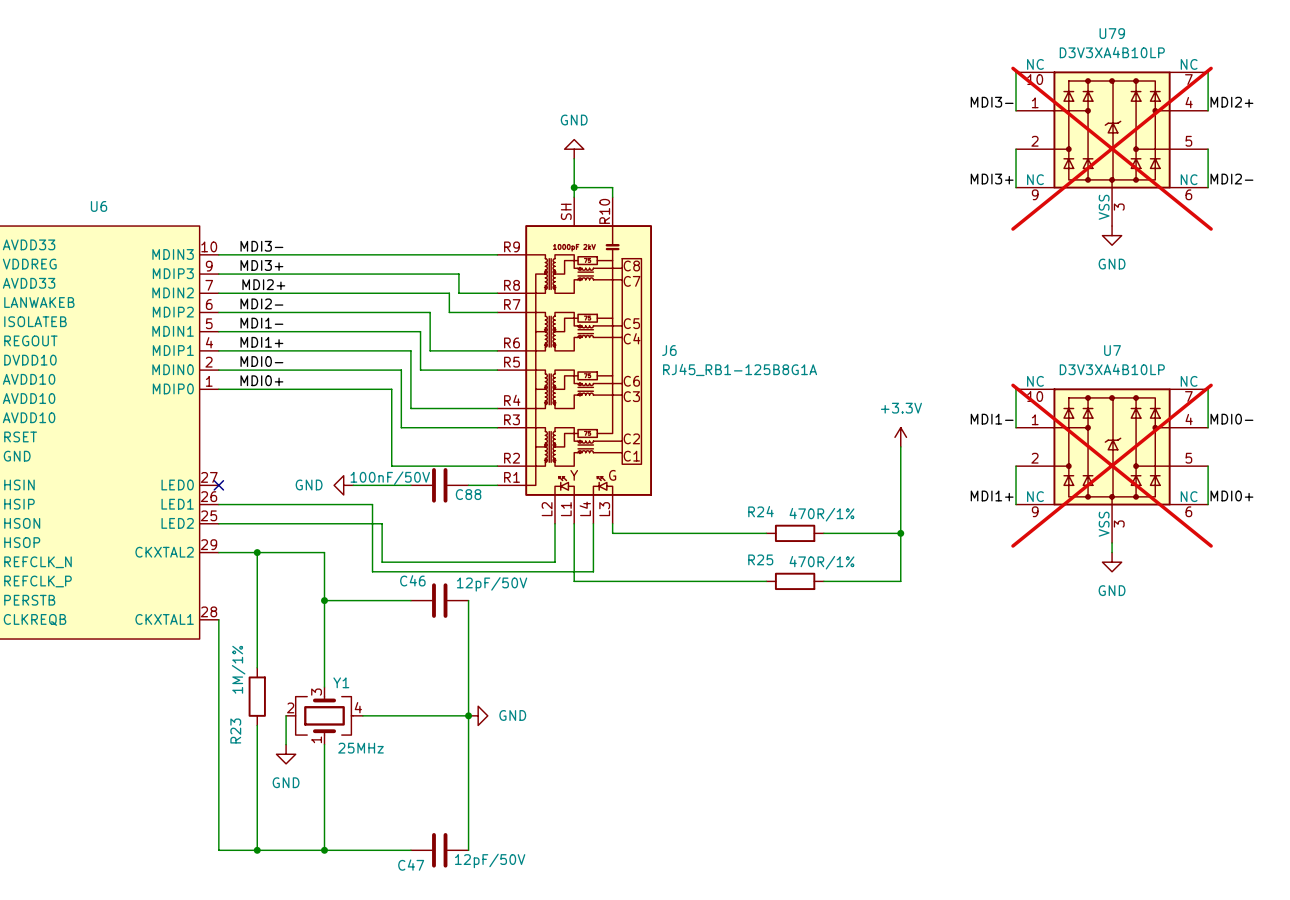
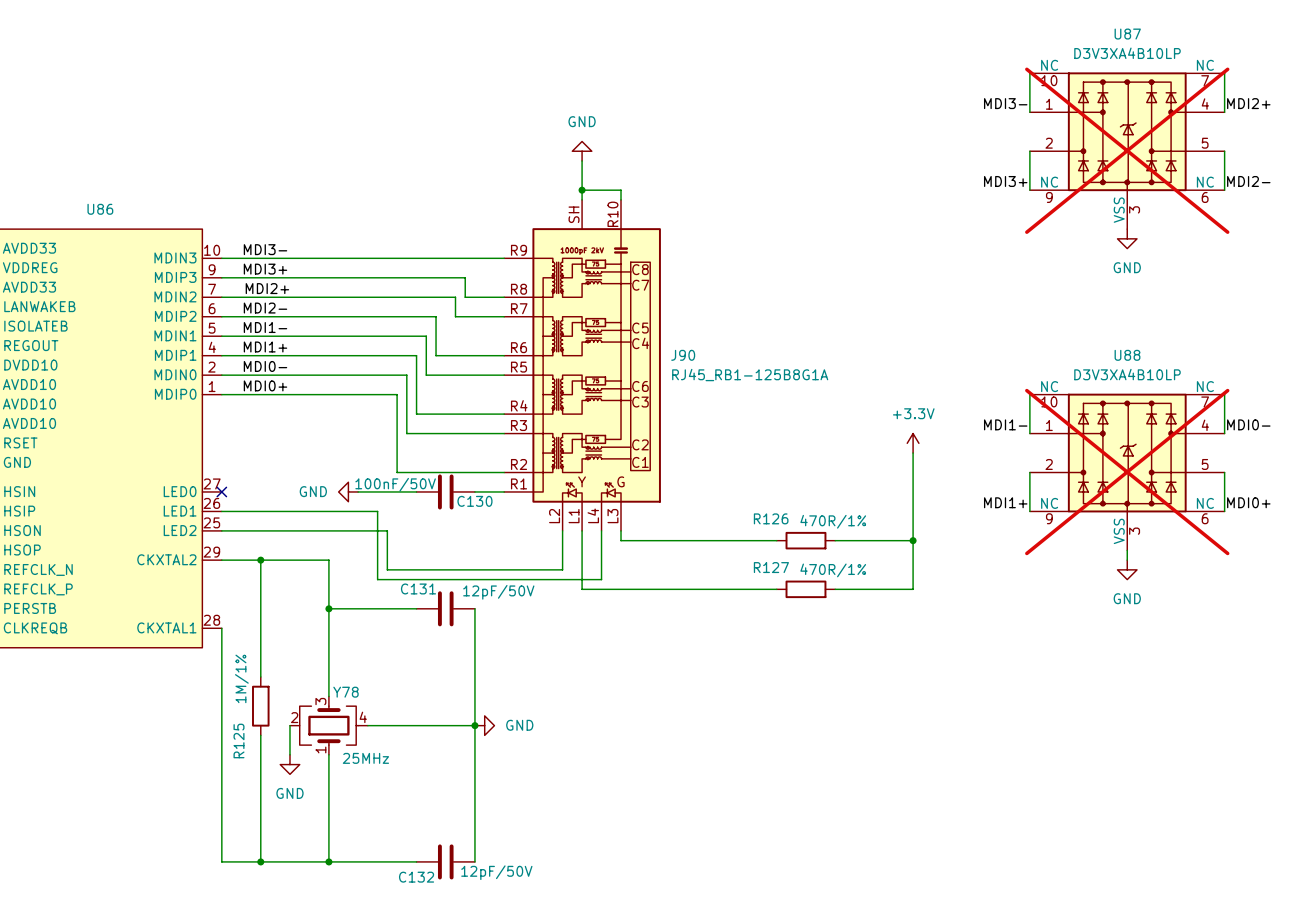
U79 name: U79 (1112, 33) -> U87 (1127, 34)
U6 name: U6 (99, 206) -> U86 (100, 209)
J6 name: J6 (669, 350) -> J90 (683, 355)
U7 name: U7 (1112, 350) -> U88 (1127, 355)
C88 name: C88 (468, 494) -> C130 (474, 501)
R24 name: R24 (760, 511) -> R126 (771, 518)
R25 name: R25 (760, 559) -> R127 (771, 567)
C46 name: C46 (412, 580) -> C131 (418, 588)
Y1 name: Y1 (341, 682) -> Y78 (345, 692)
R23 name: R23 (235, 730) -> R125 (239, 740)
C47 name: C47 (411, 865) -> C132 (416, 877)

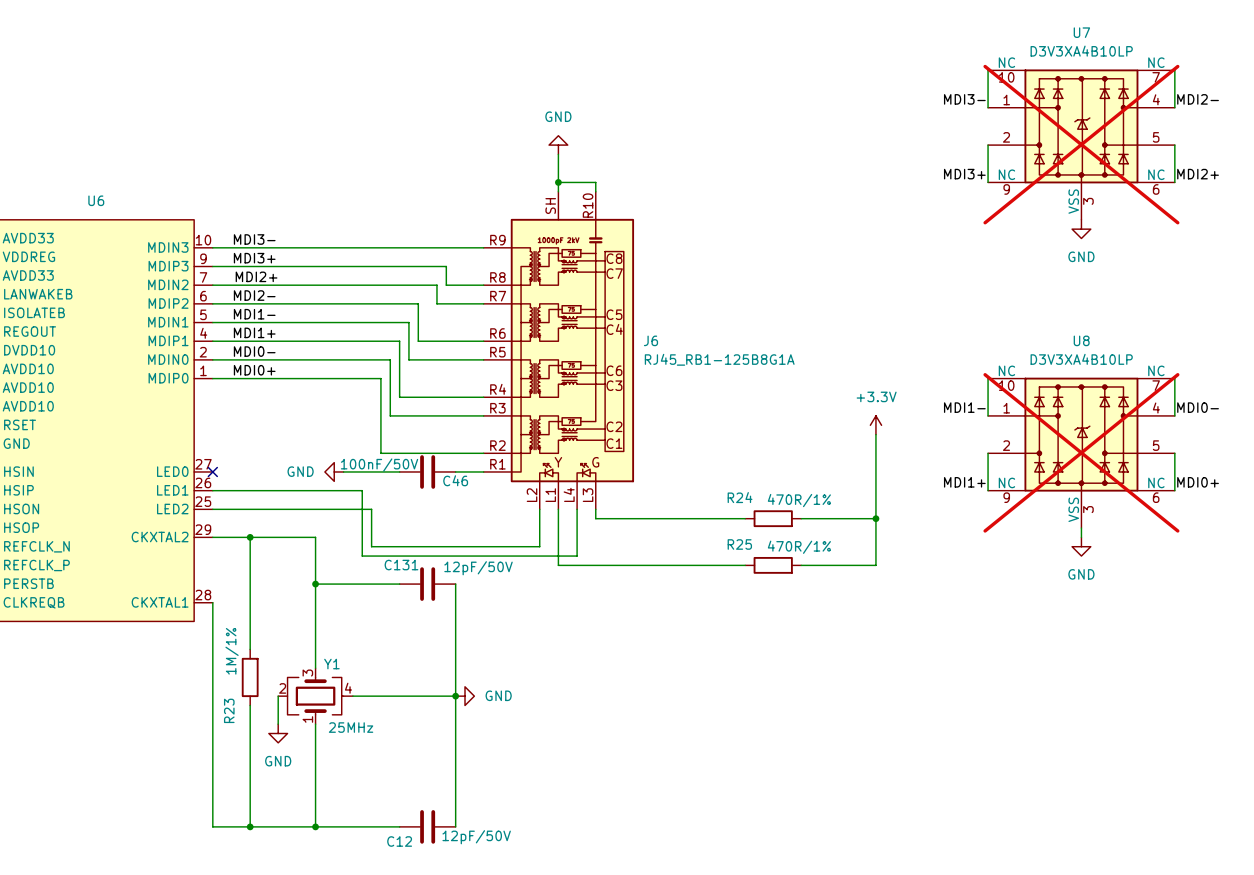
U87 name: U87 (1127, 34) -> U7 (1081, 32)
label: MDI2+ (1248, 103) -> MDI2- (1198, 99)
label: MDI2- (1248, 181) -> MDI2+ (1198, 174)
U86 name: U86 (100, 209) -> U6 (96, 200)
J90 name: J90 (683, 355) -> J6 (650, 340)
U88 name: U88 (1127, 355) -> U8 (1081, 340)
C130 name: C130 (474, 501) -> C46 (455, 480)
R126 name: R126 (771, 518) -> R24 (740, 497)
R127 name: R127 (771, 567) -> R25 (739, 544)
Y78 name: Y78 (345, 692) -> Y1 (331, 664)
R125 name: R125 (239, 740) -> R23 (229, 710)
C132 name: C132 (416, 877) -> C12 (399, 841)

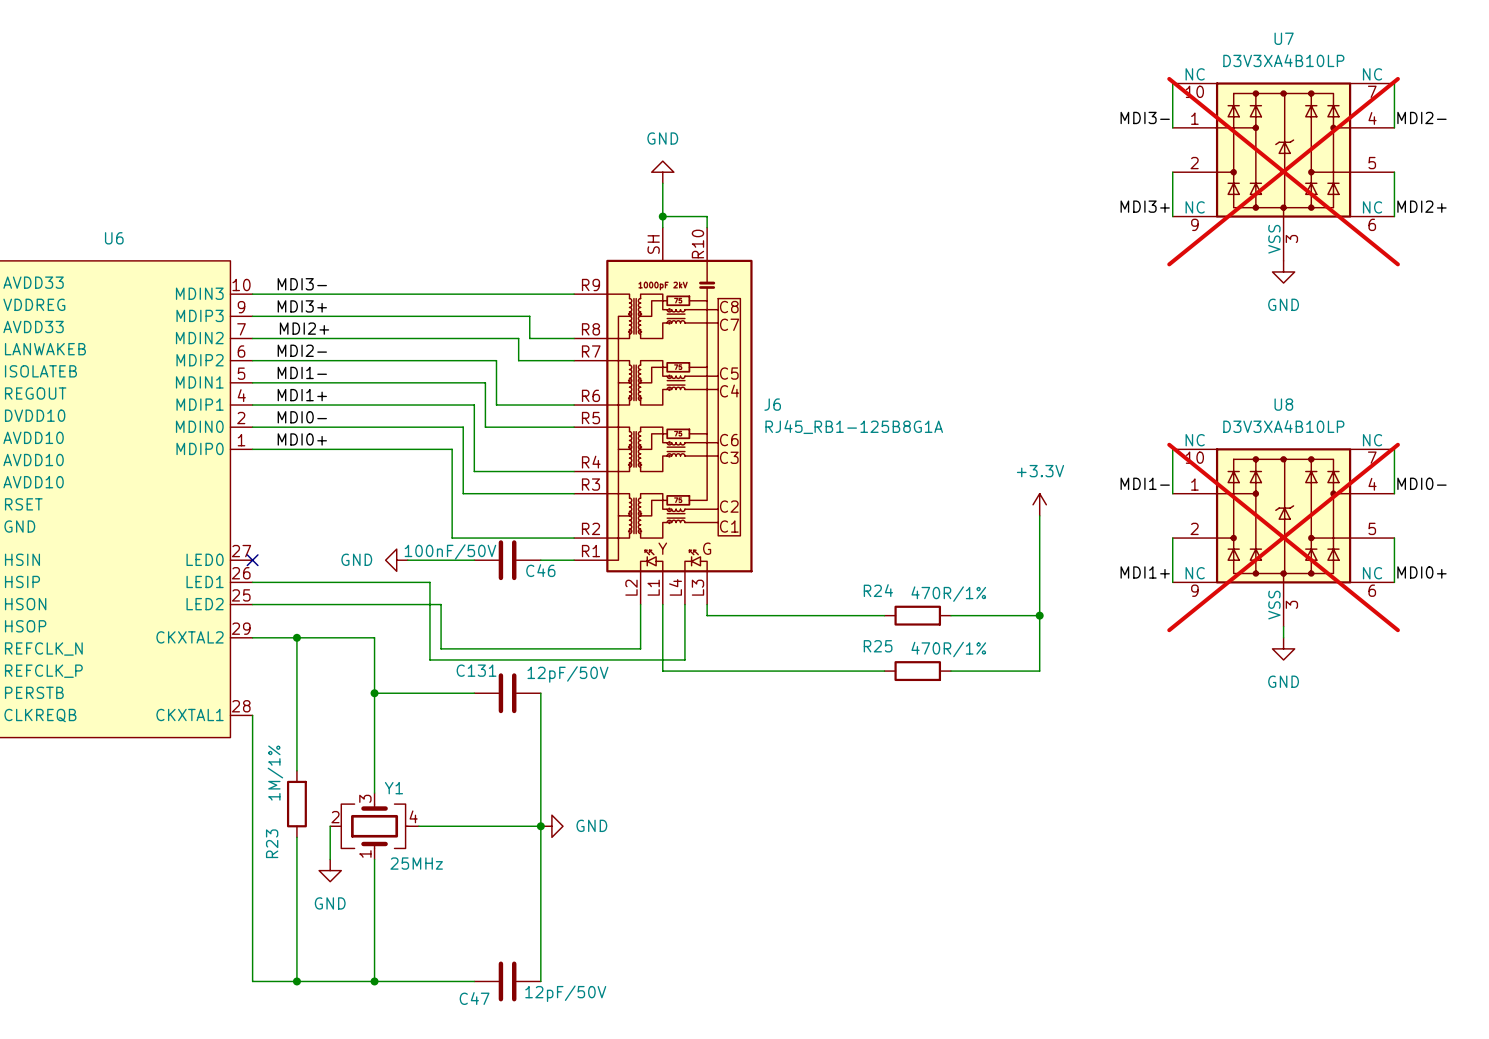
C12 name: C12 (399, 841) -> C47 (474, 998)

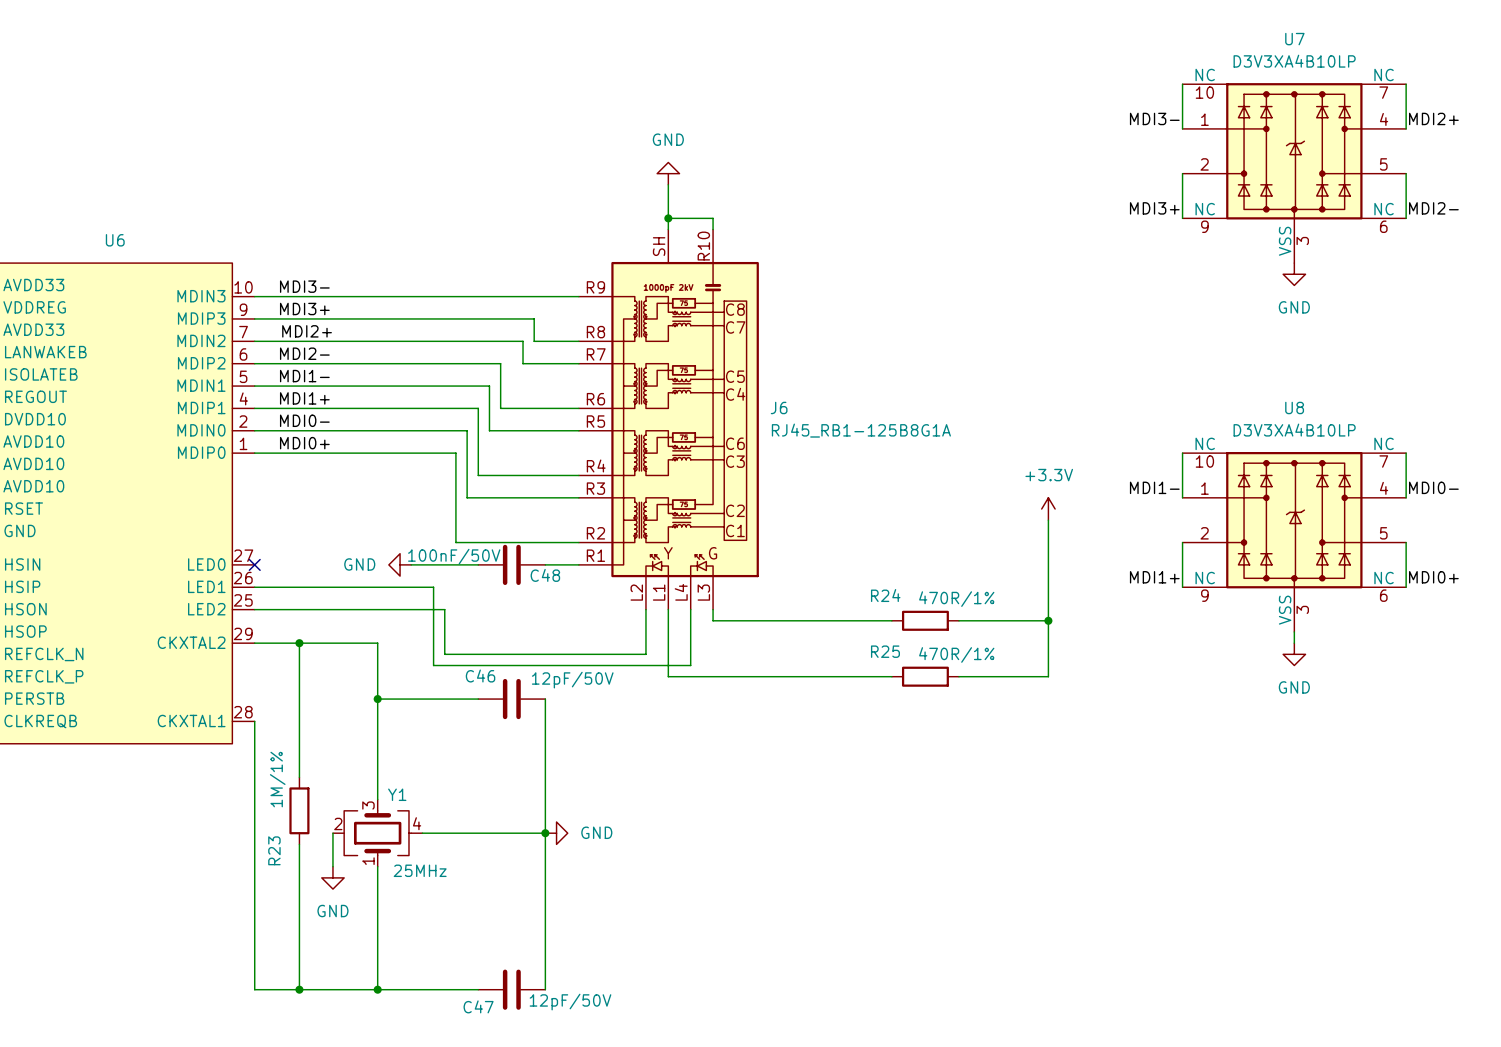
label: MDI2- (1421, 117) -> MDI2+ (1433, 118)
U7 do-not-place cross: (1283, 171) -> none
label: MDI2+ (1421, 206) -> MDI2- (1433, 208)
U8 do-not-place cross: (1283, 537) -> none
C46 name: C46 (540, 570) -> C48 (545, 575)
C131 name: C131 (476, 670) -> C46 (480, 676)

